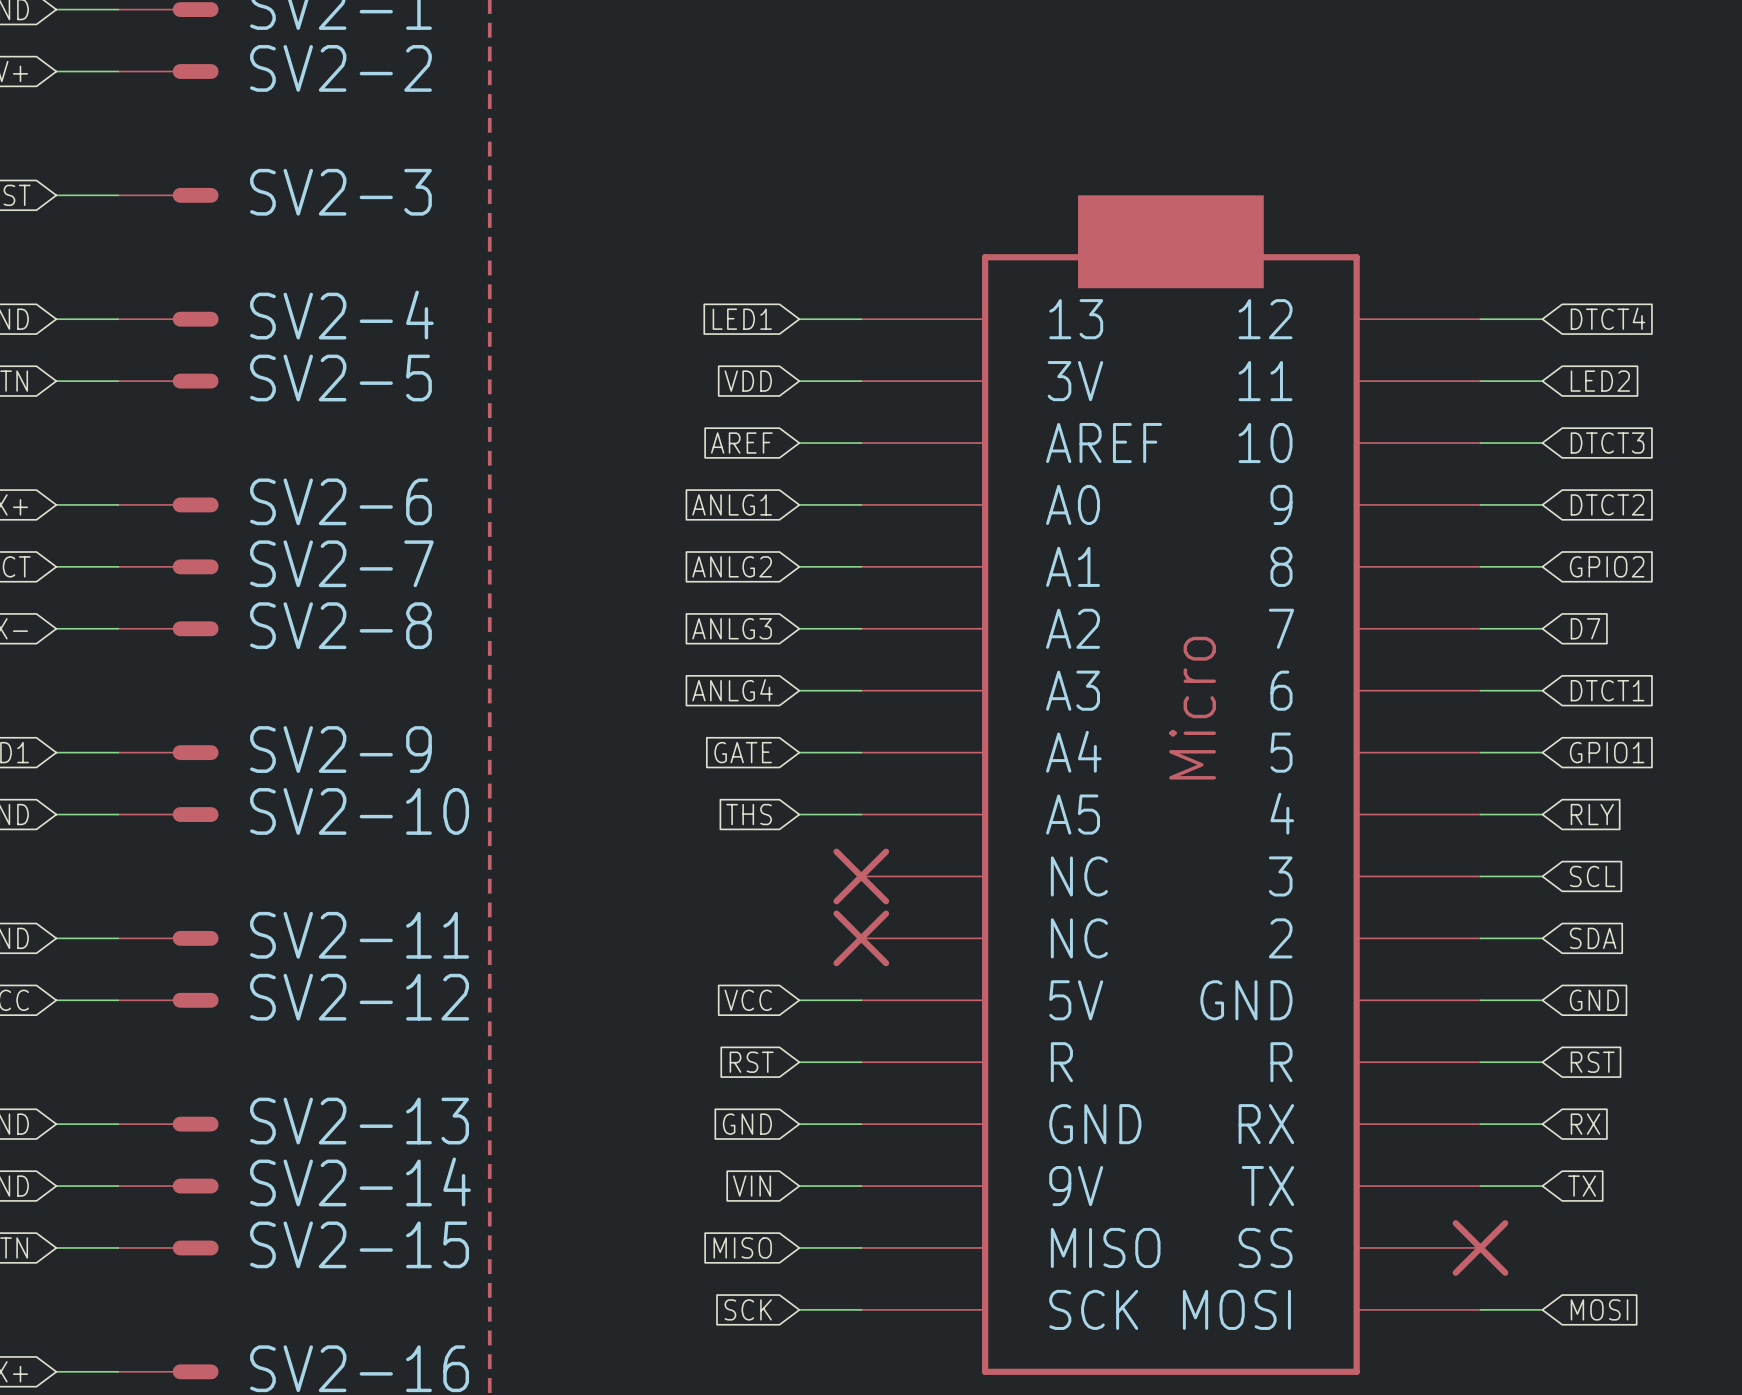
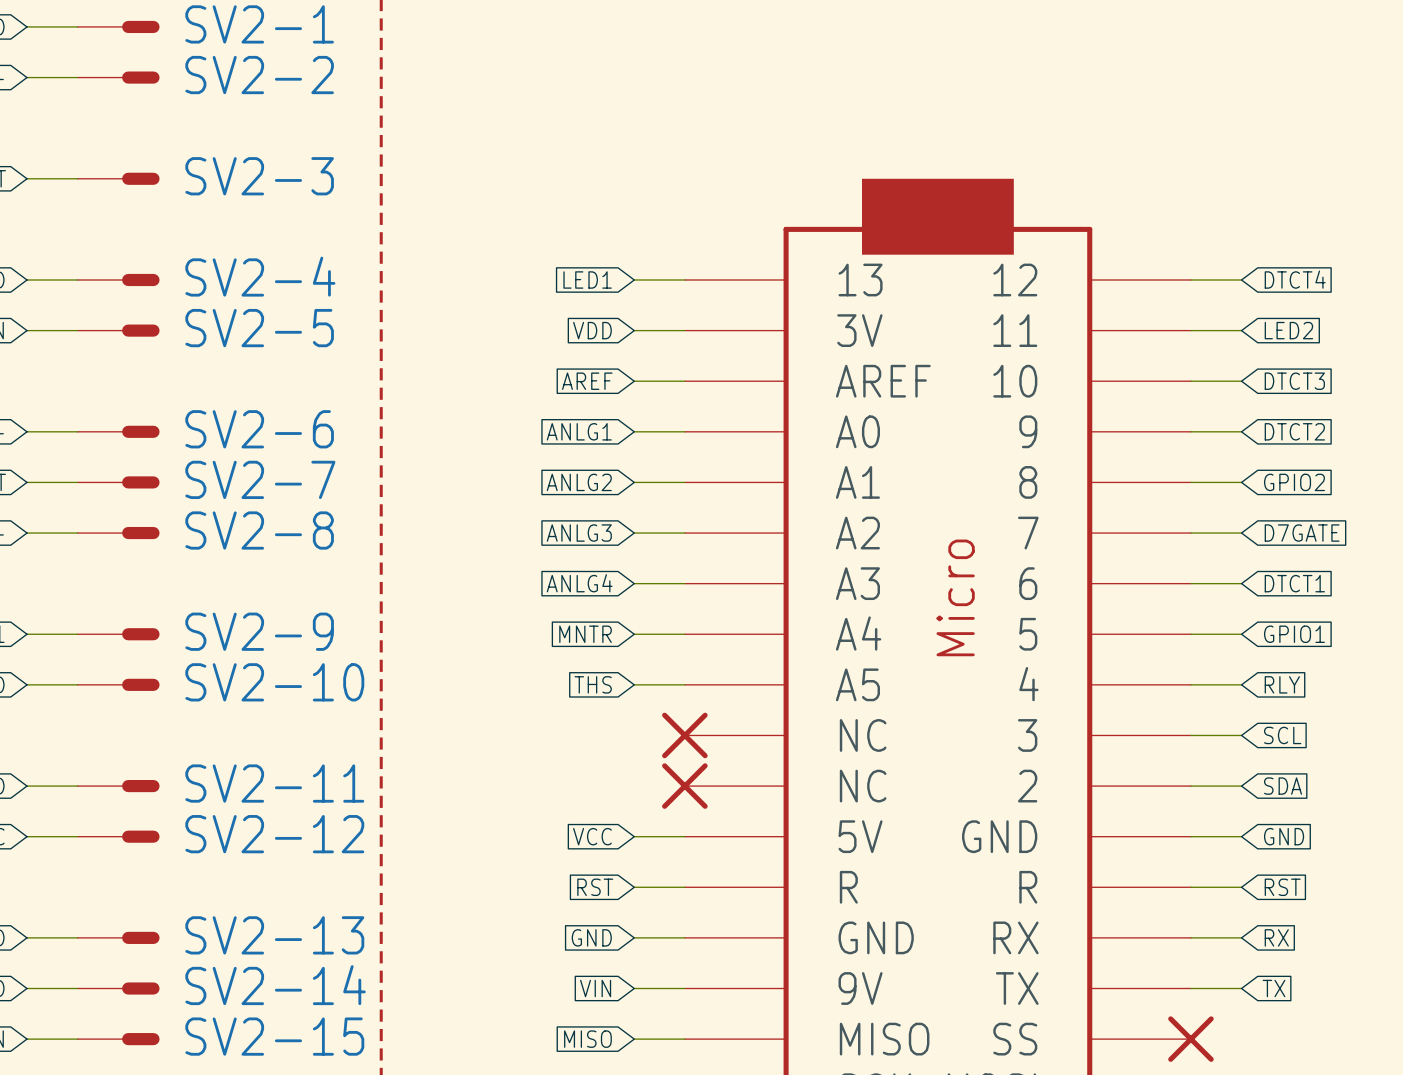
global label: D7 (1585, 628) -> D7GATE (1302, 533)
global label: GATE (743, 752) -> MNTR (585, 634)

